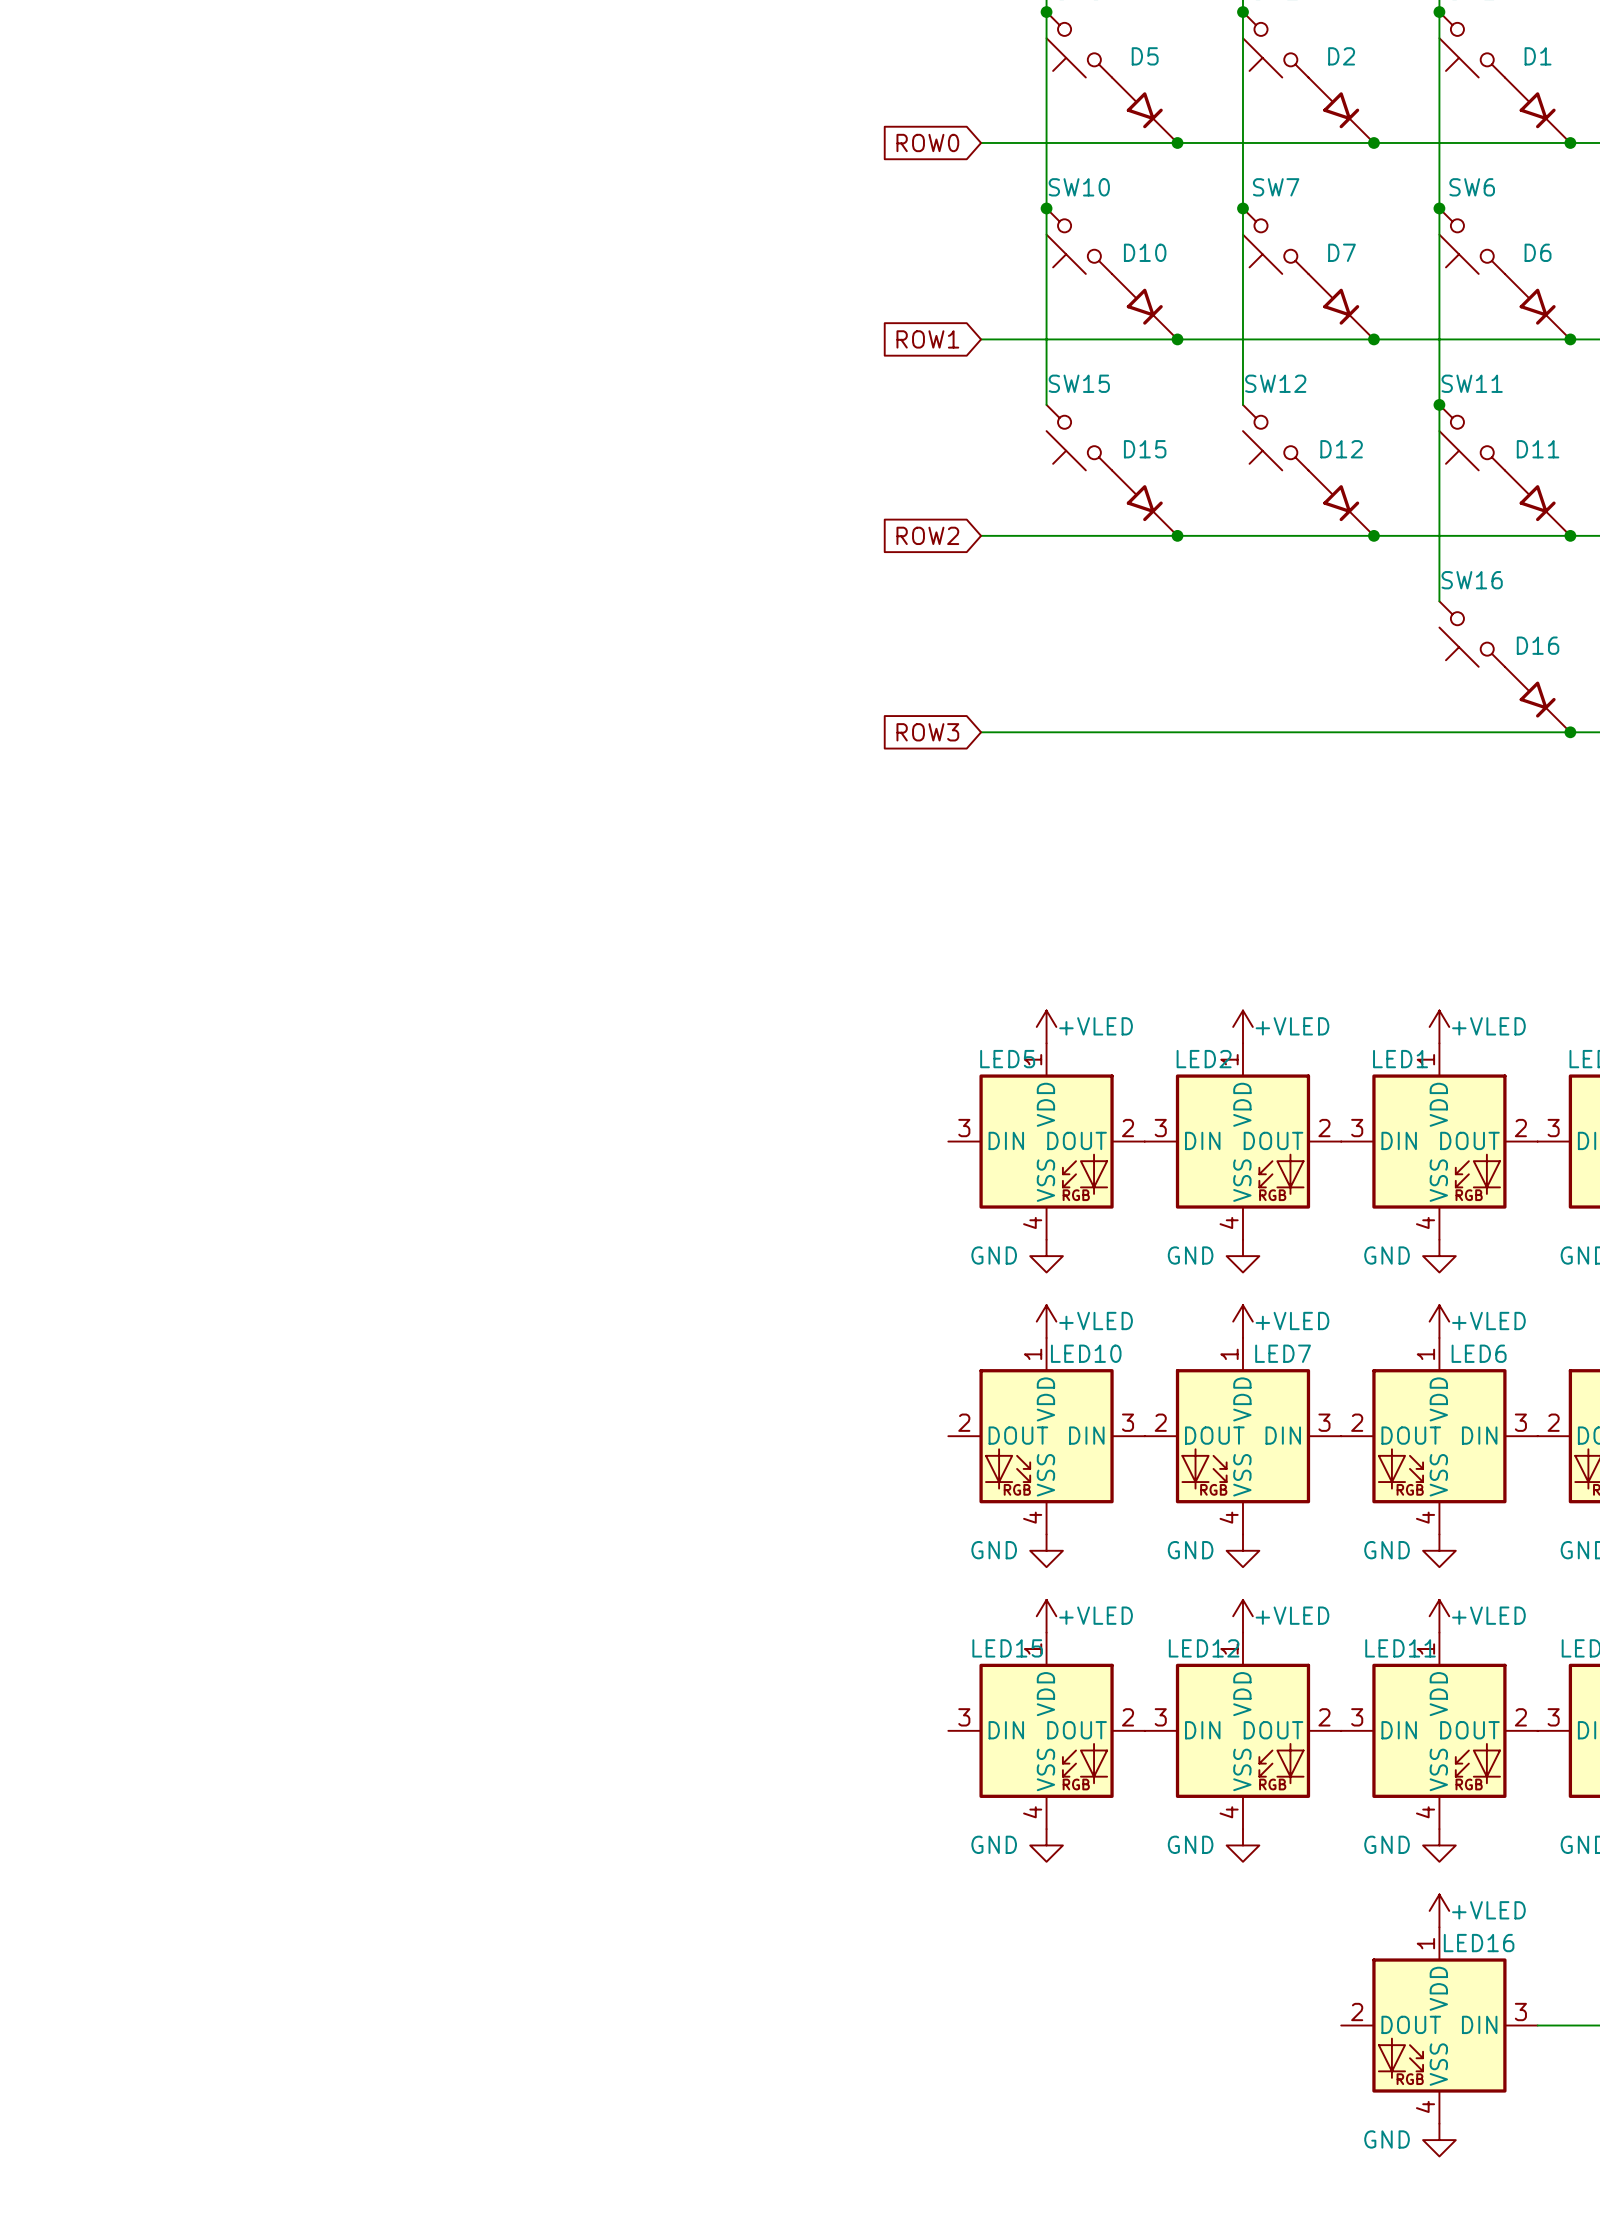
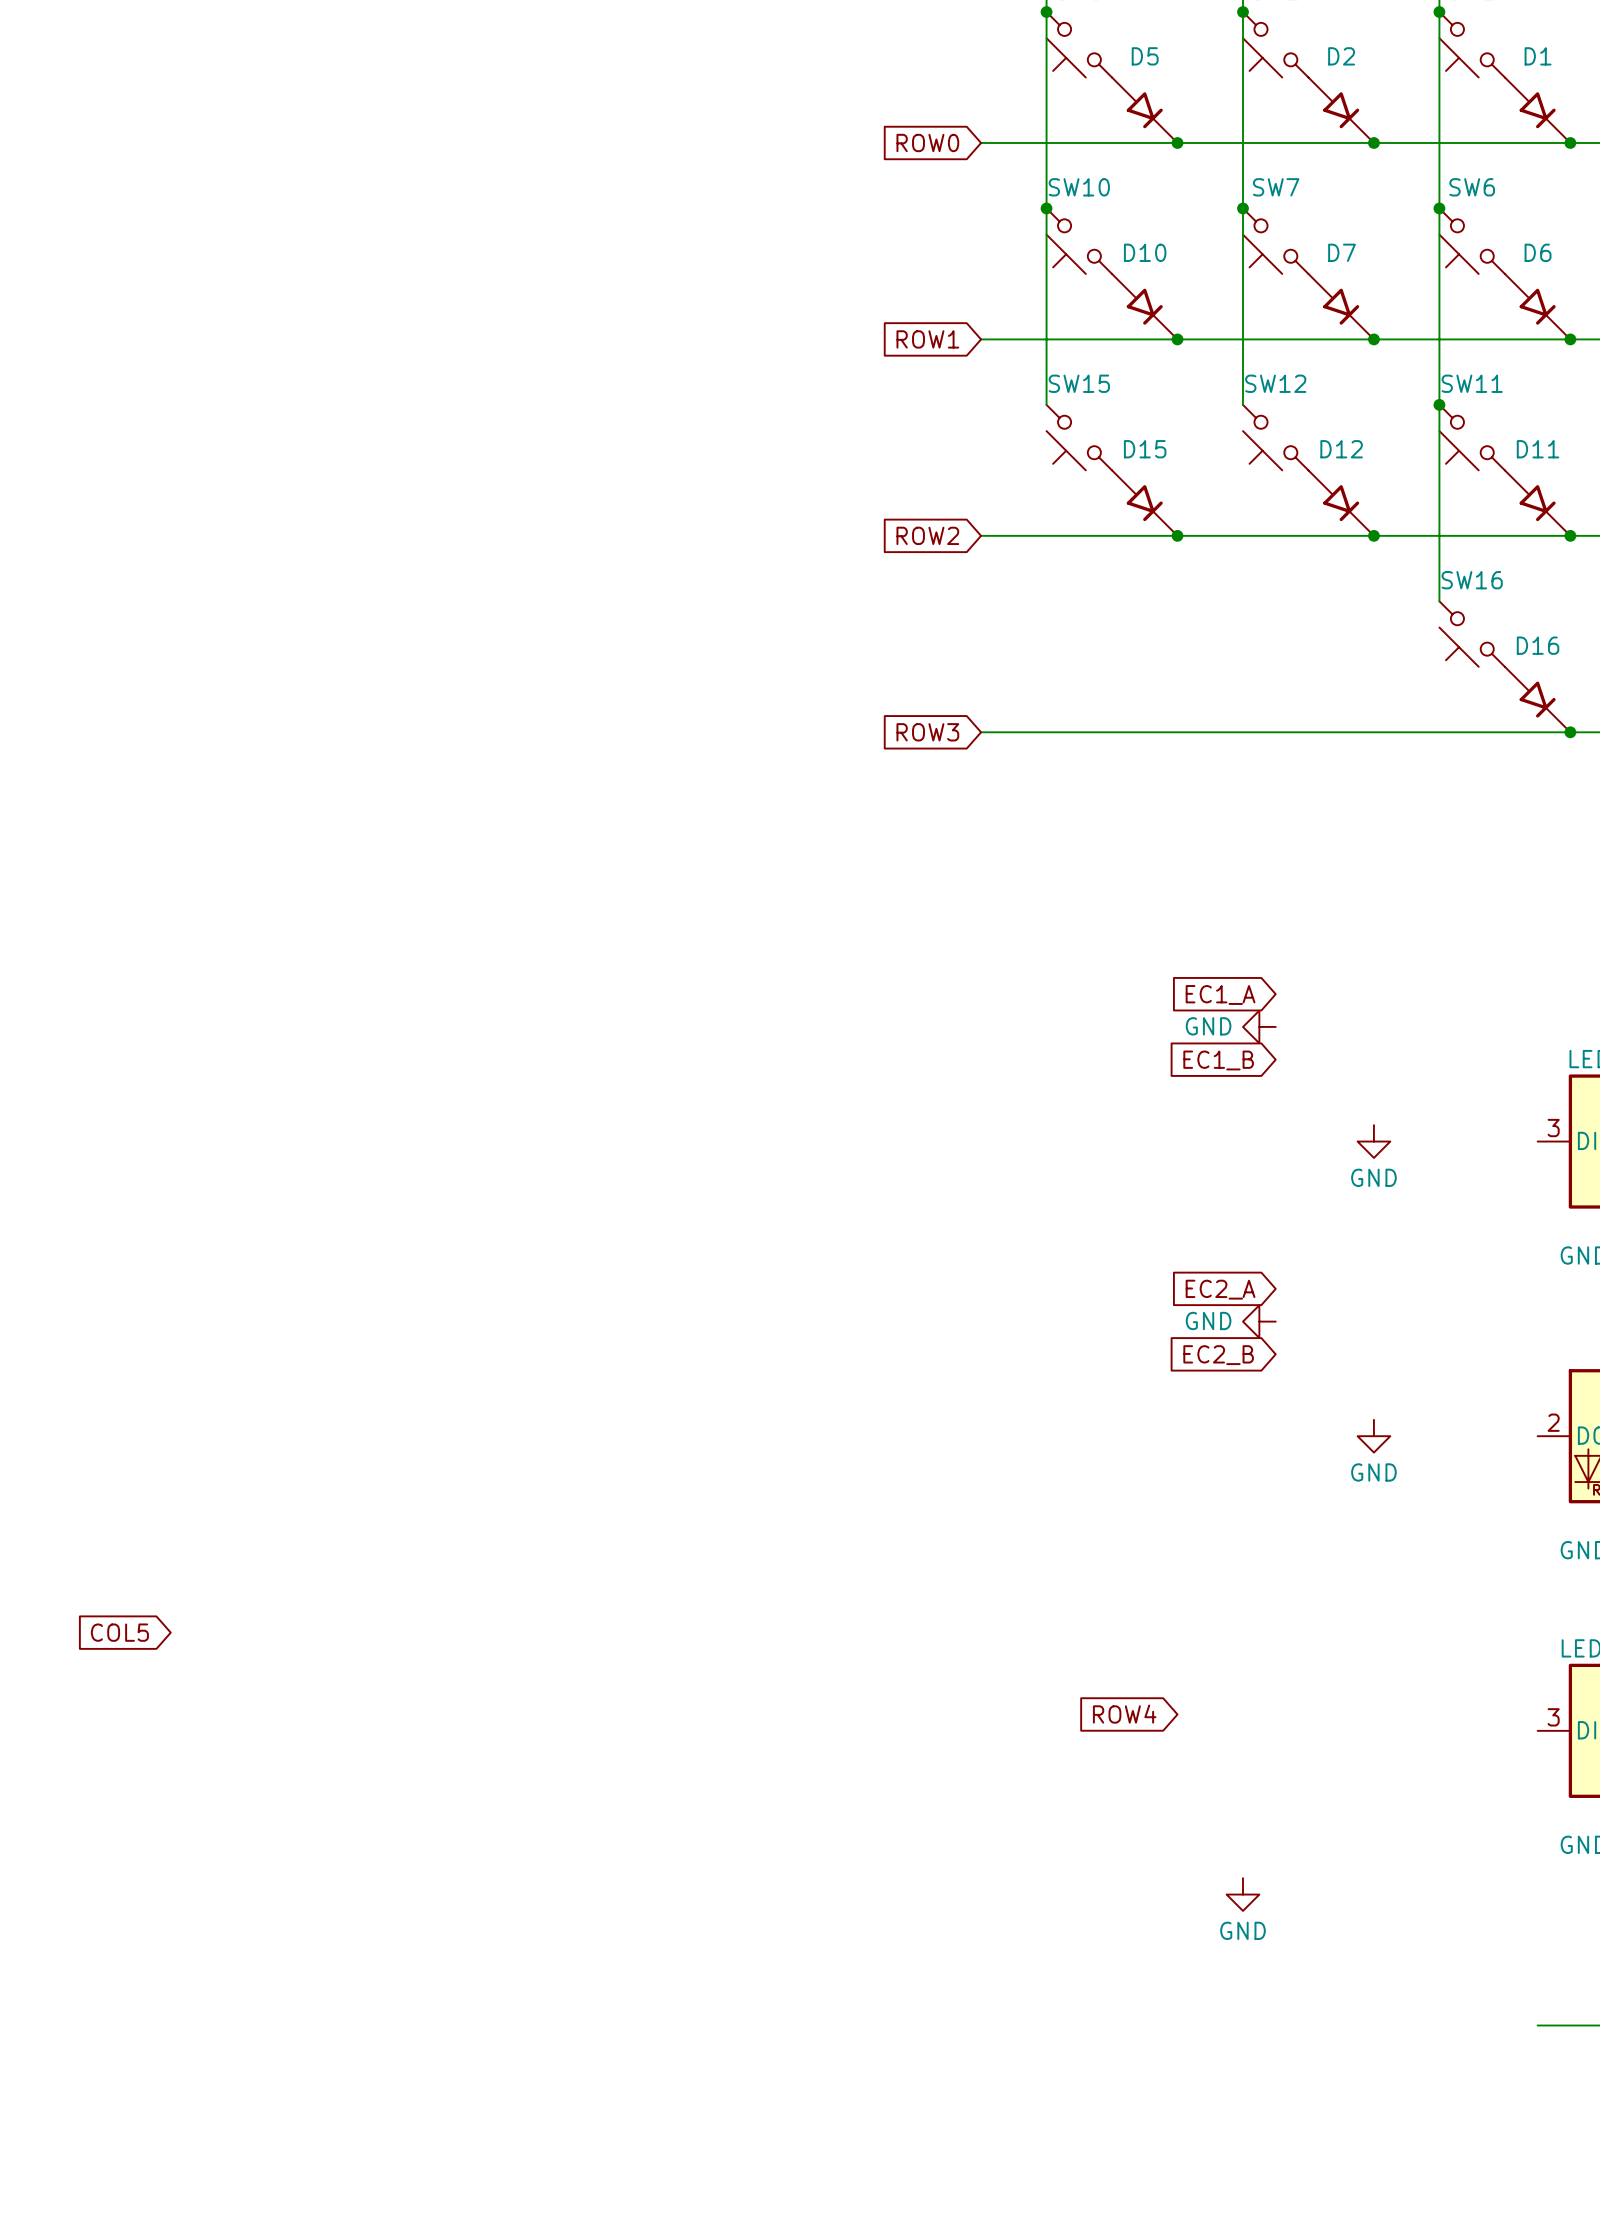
global label: none -> EC1_A (1220, 994)
power symbol: +VLED (1046, 1026) -> none
power symbol: +VLED (1242, 1026) -> none
power symbol: none -> GND (1259, 1026)
power symbol: +VLED (1439, 1026) -> none
global label: none -> EC1_B (1218, 1060)
LED5: (1046, 1141) -> none
LED2: (1242, 1141) -> none
power symbol: none -> GND (1373, 1141)
LED1: (1439, 1141) -> none
power symbol: GND (1046, 1256) -> none
power symbol rotation: 0° (1242, 1256) -> 90° clockwise (1259, 1321)
power symbol position: GND (1242, 1256) -> GND (1259, 1321)
power symbol: GND (1439, 1256) -> none
global label: none -> EC2_A (1220, 1289)
power symbol: +VLED (1046, 1321) -> none
power symbol: +VLED (1242, 1321) -> none
power symbol: +VLED (1439, 1321) -> none
global label: none -> EC2_B (1218, 1355)
LED10: (1046, 1436) -> none
LED7: (1242, 1436) -> none
power symbol: none -> GND (1373, 1436)
LED6: (1439, 1436) -> none
power symbol: GND (1046, 1550) -> none
power symbol: GND (1242, 1550) -> none
power symbol: GND (1439, 1550) -> none
power symbol: +VLED (1046, 1616) -> none
power symbol: +VLED (1242, 1616) -> none
power symbol: +VLED (1439, 1616) -> none
global label: none -> COL5 (119, 1632)
global label: none -> ROW4 (1124, 1714)
LED15: (1046, 1730) -> none
LED12: (1242, 1730) -> none
LED11: (1439, 1730) -> none
power symbol text position: GND (1190, 1844) -> GND (1242, 1930)
power symbol: GND (1046, 1845) -> none
power symbol position: GND (1242, 1845) -> GND (1242, 1894)
power symbol: GND (1439, 1845) -> none
power symbol: +VLED (1439, 1910) -> none
LED16: (1439, 2025) -> none
power symbol: GND (1439, 2140) -> none

